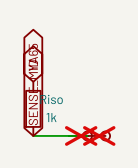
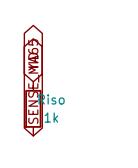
wire: (33, 135) (87, 135) -> none
part: (81, 135) -> none
part: (99, 135) -> none

